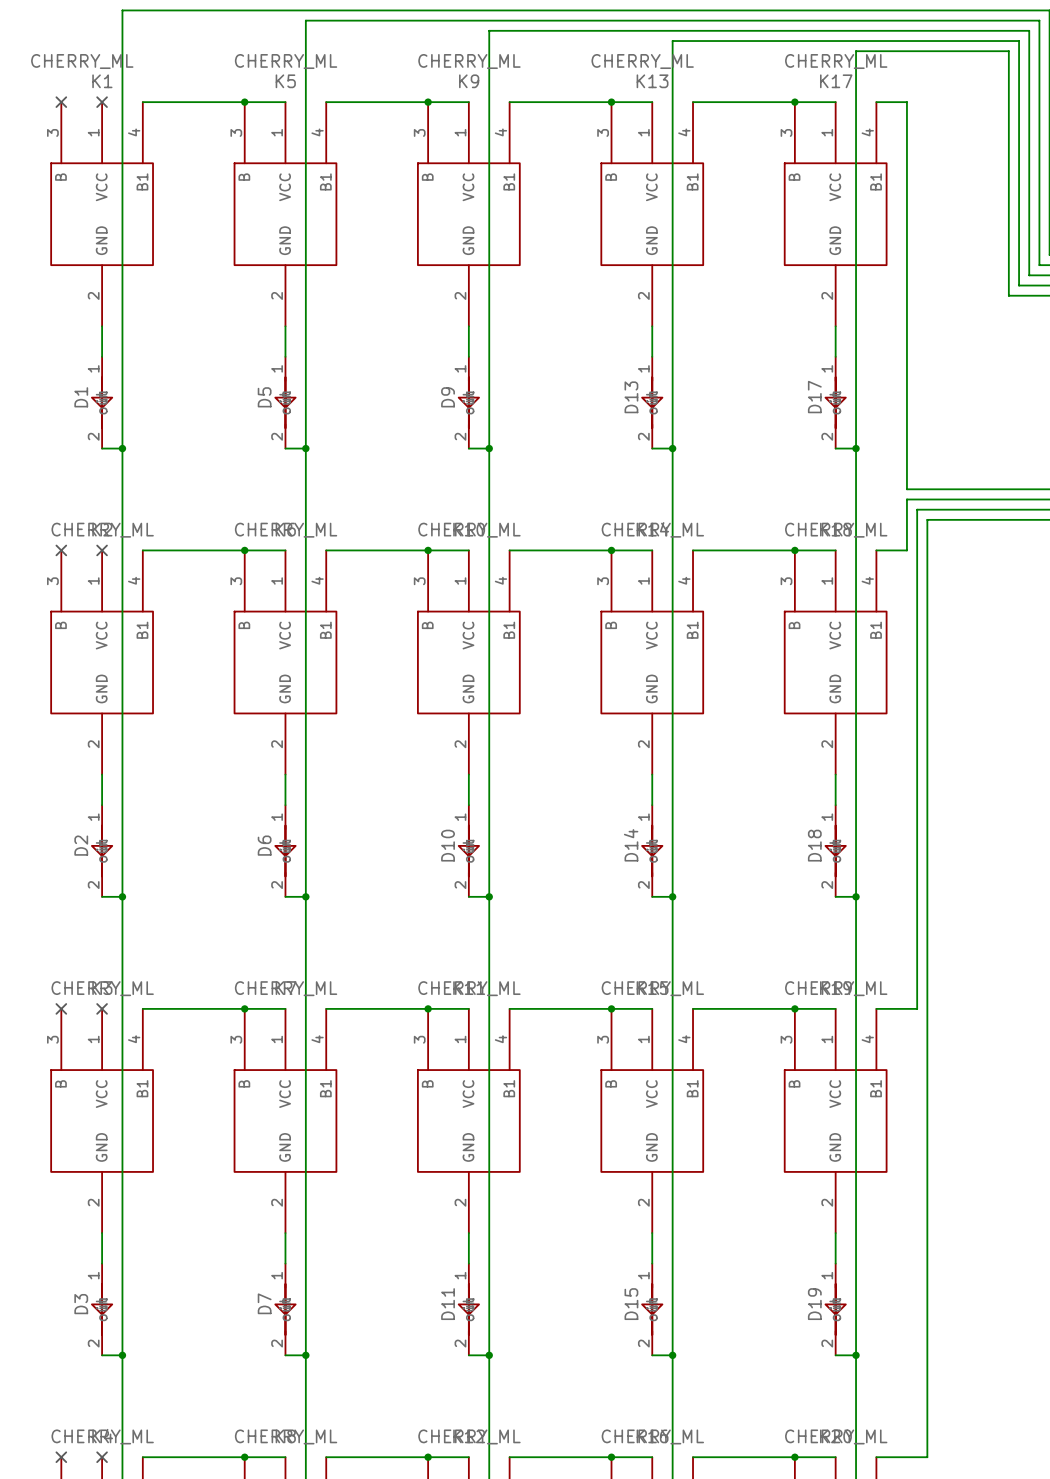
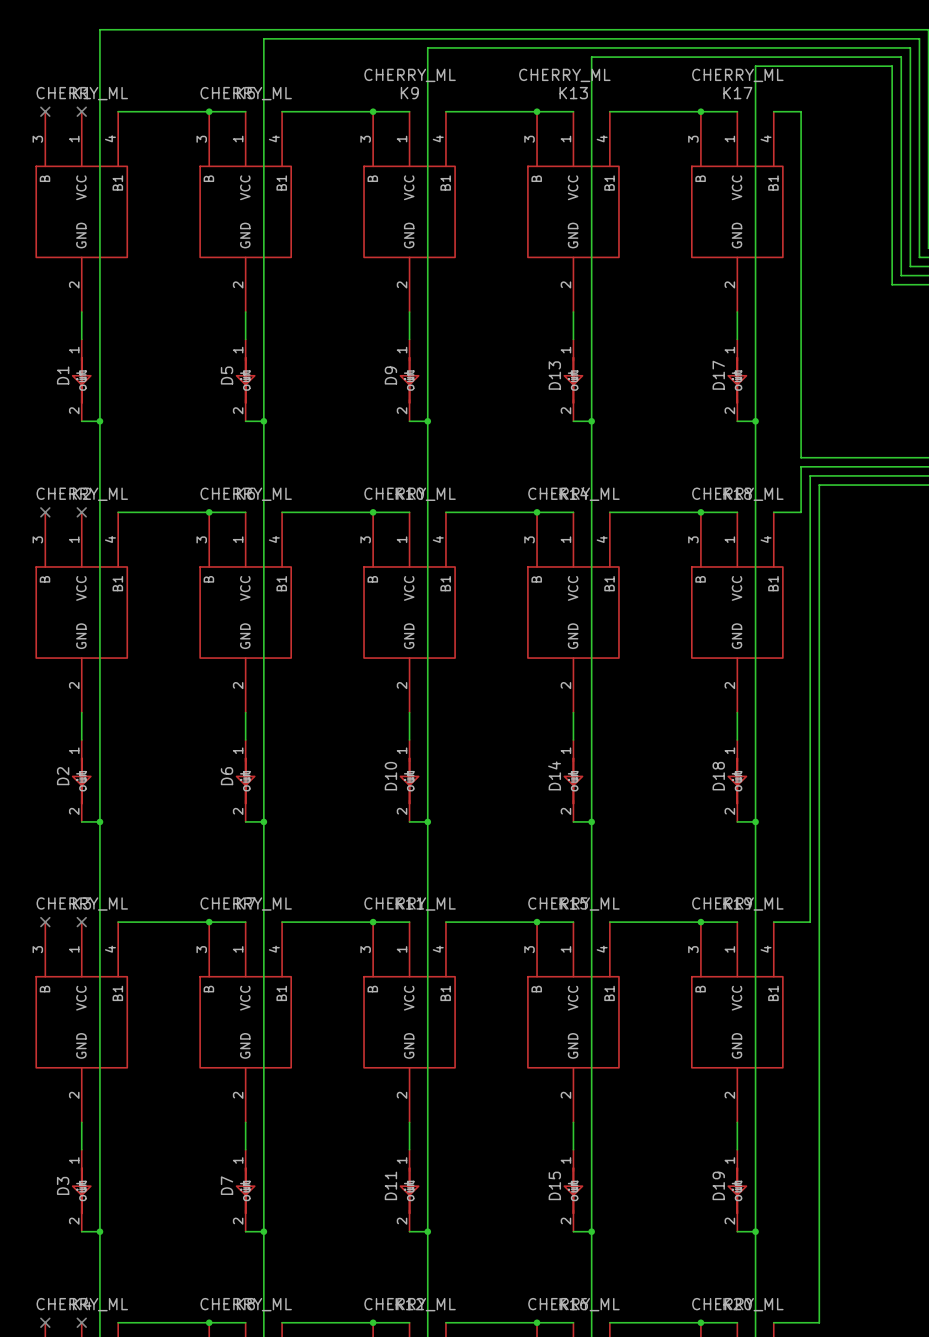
K1 value position: CHERRY_ML (82, 61) -> CHERRY_ML (82, 93)
K5 value position: CHERRY_ML (286, 61) -> CHERRY_ML (246, 93)

